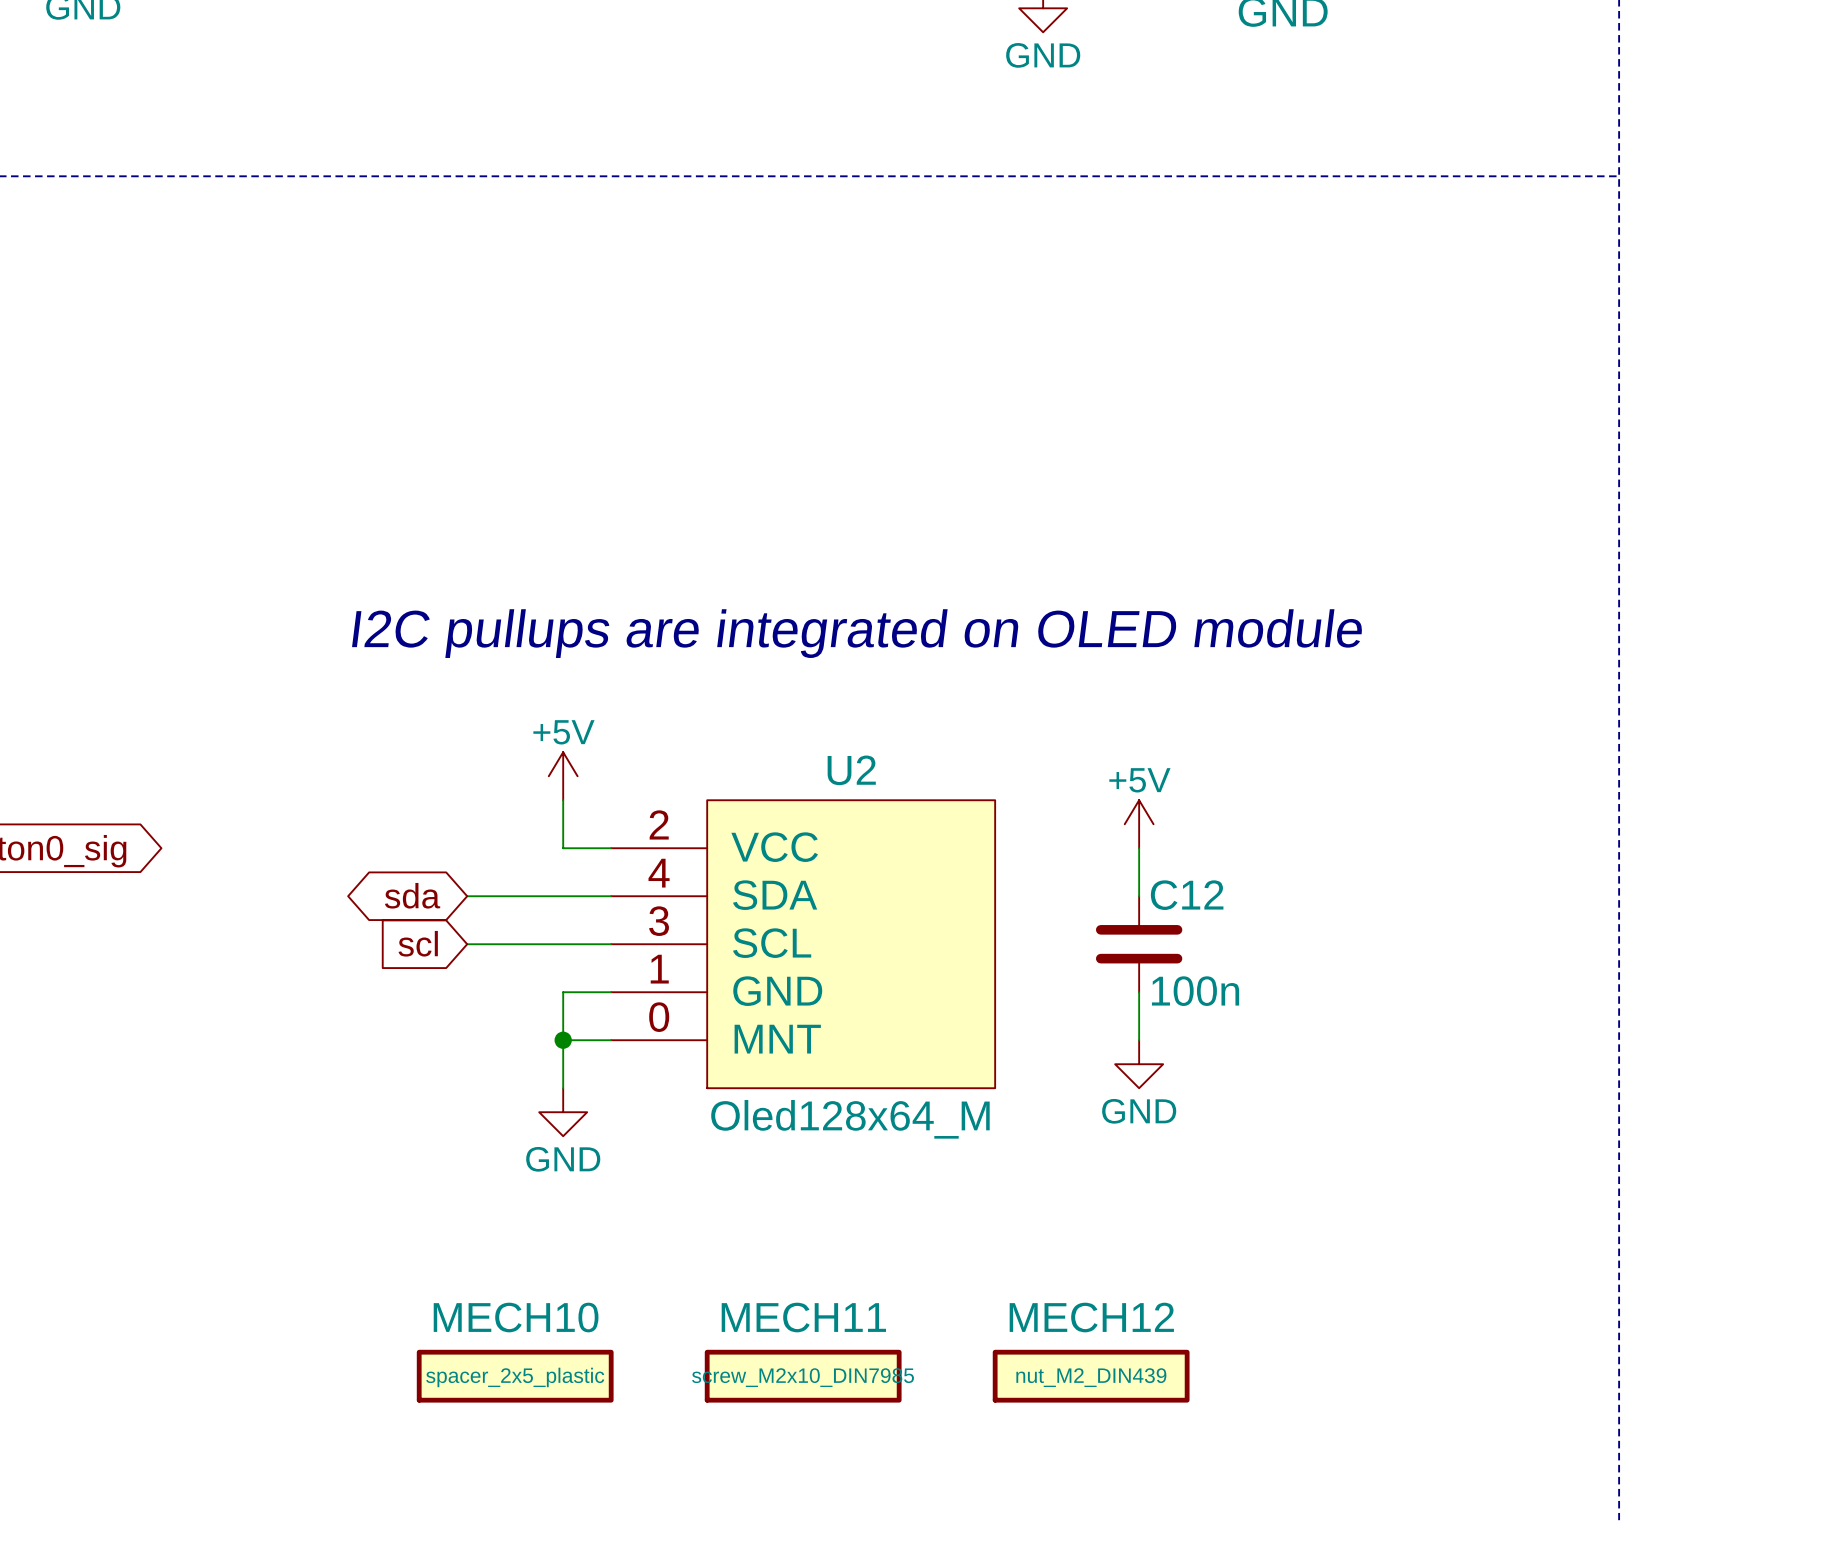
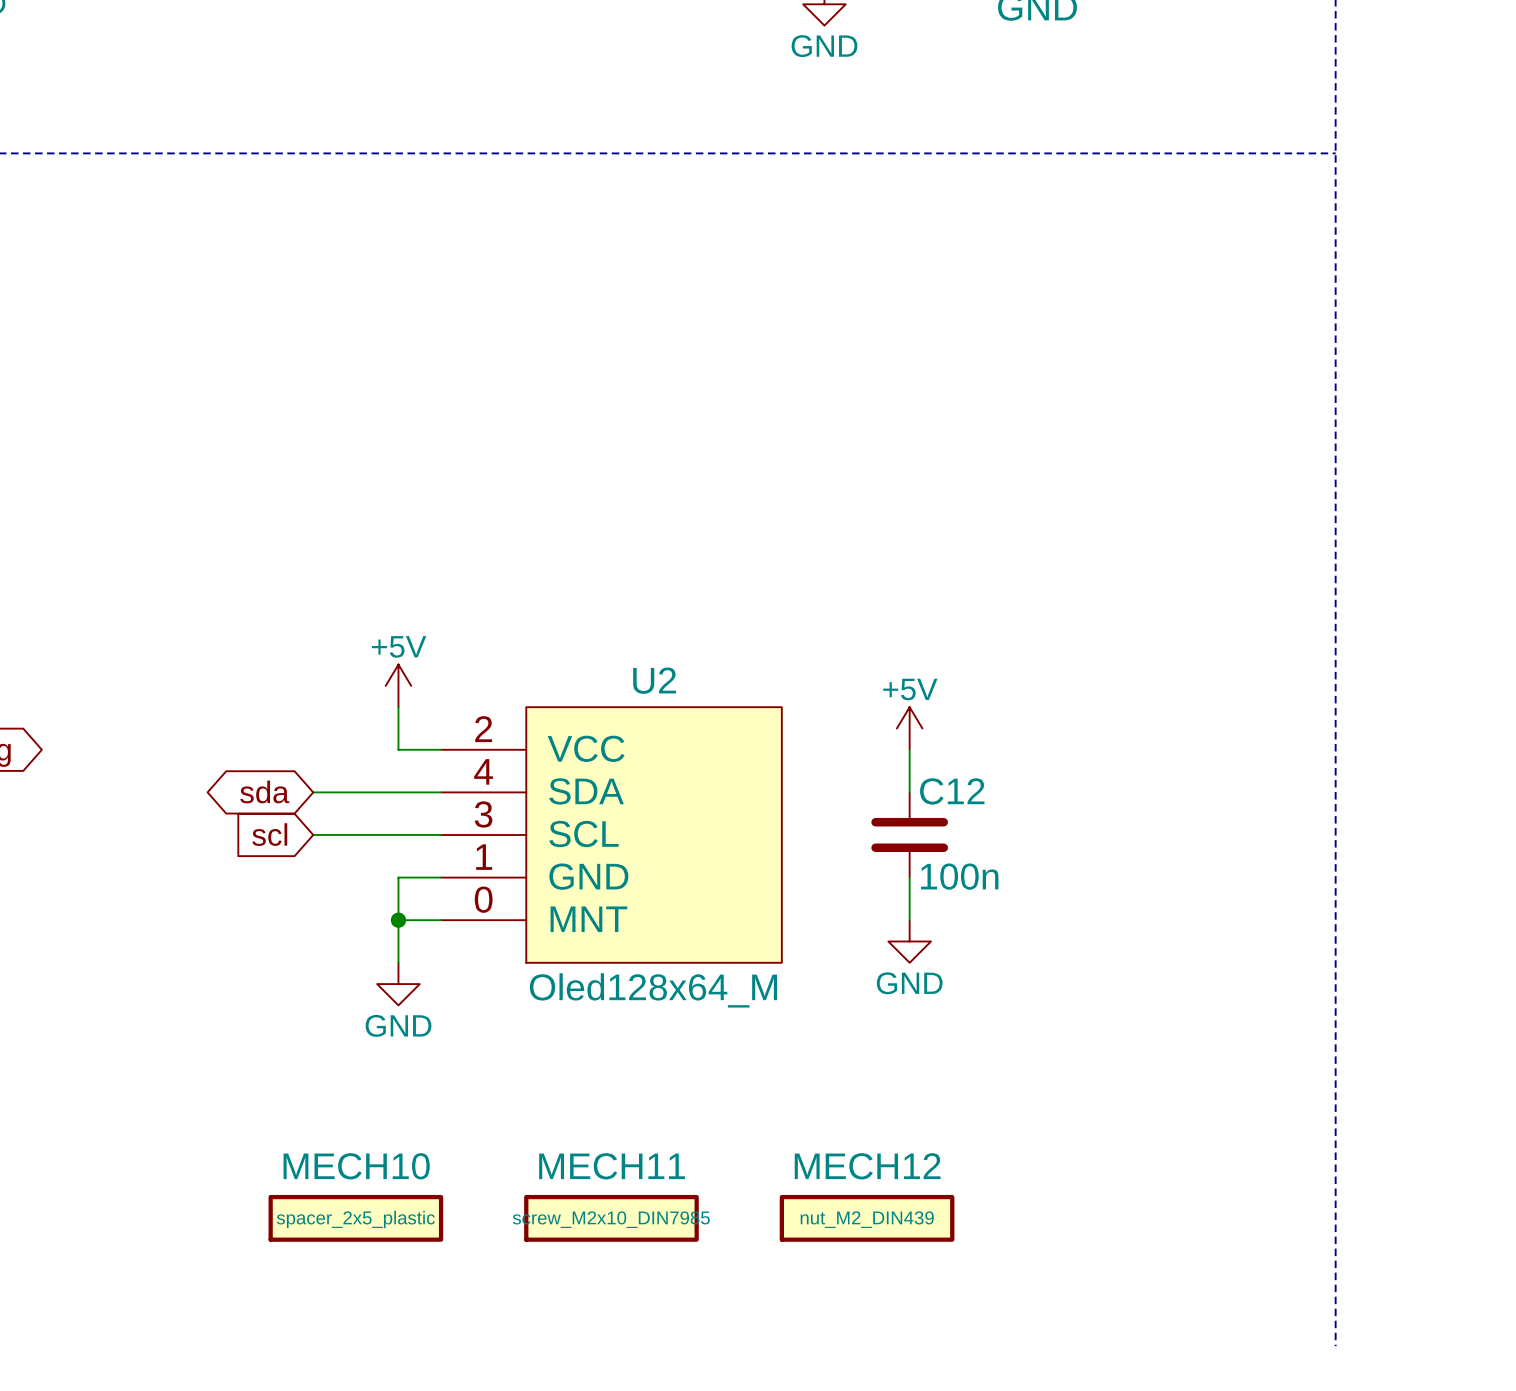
text: I2C pullups are integrated on OLED module (857, 633) -> none

